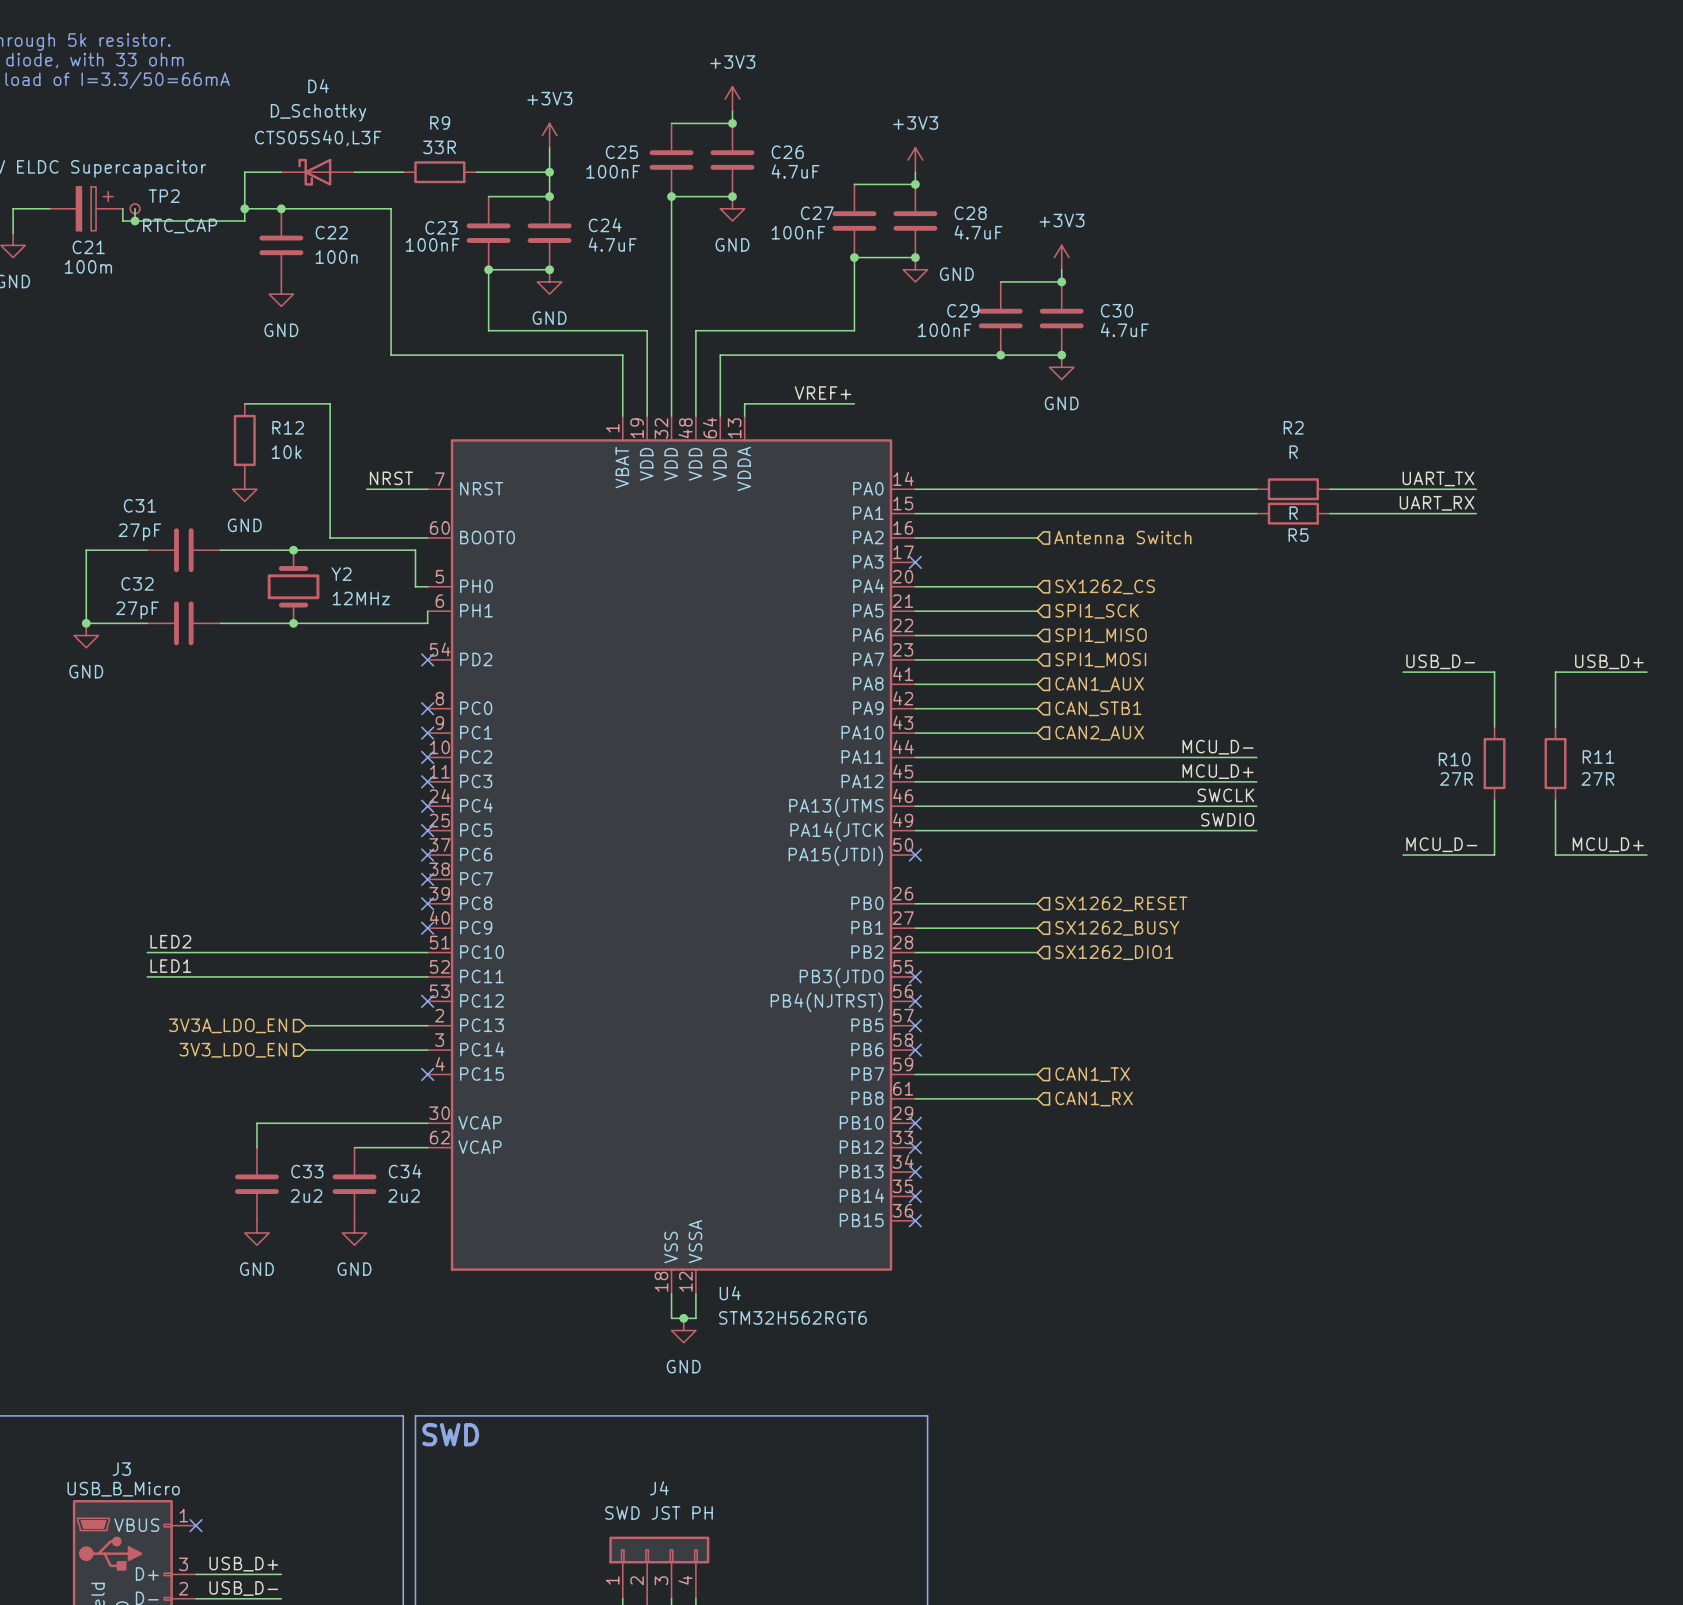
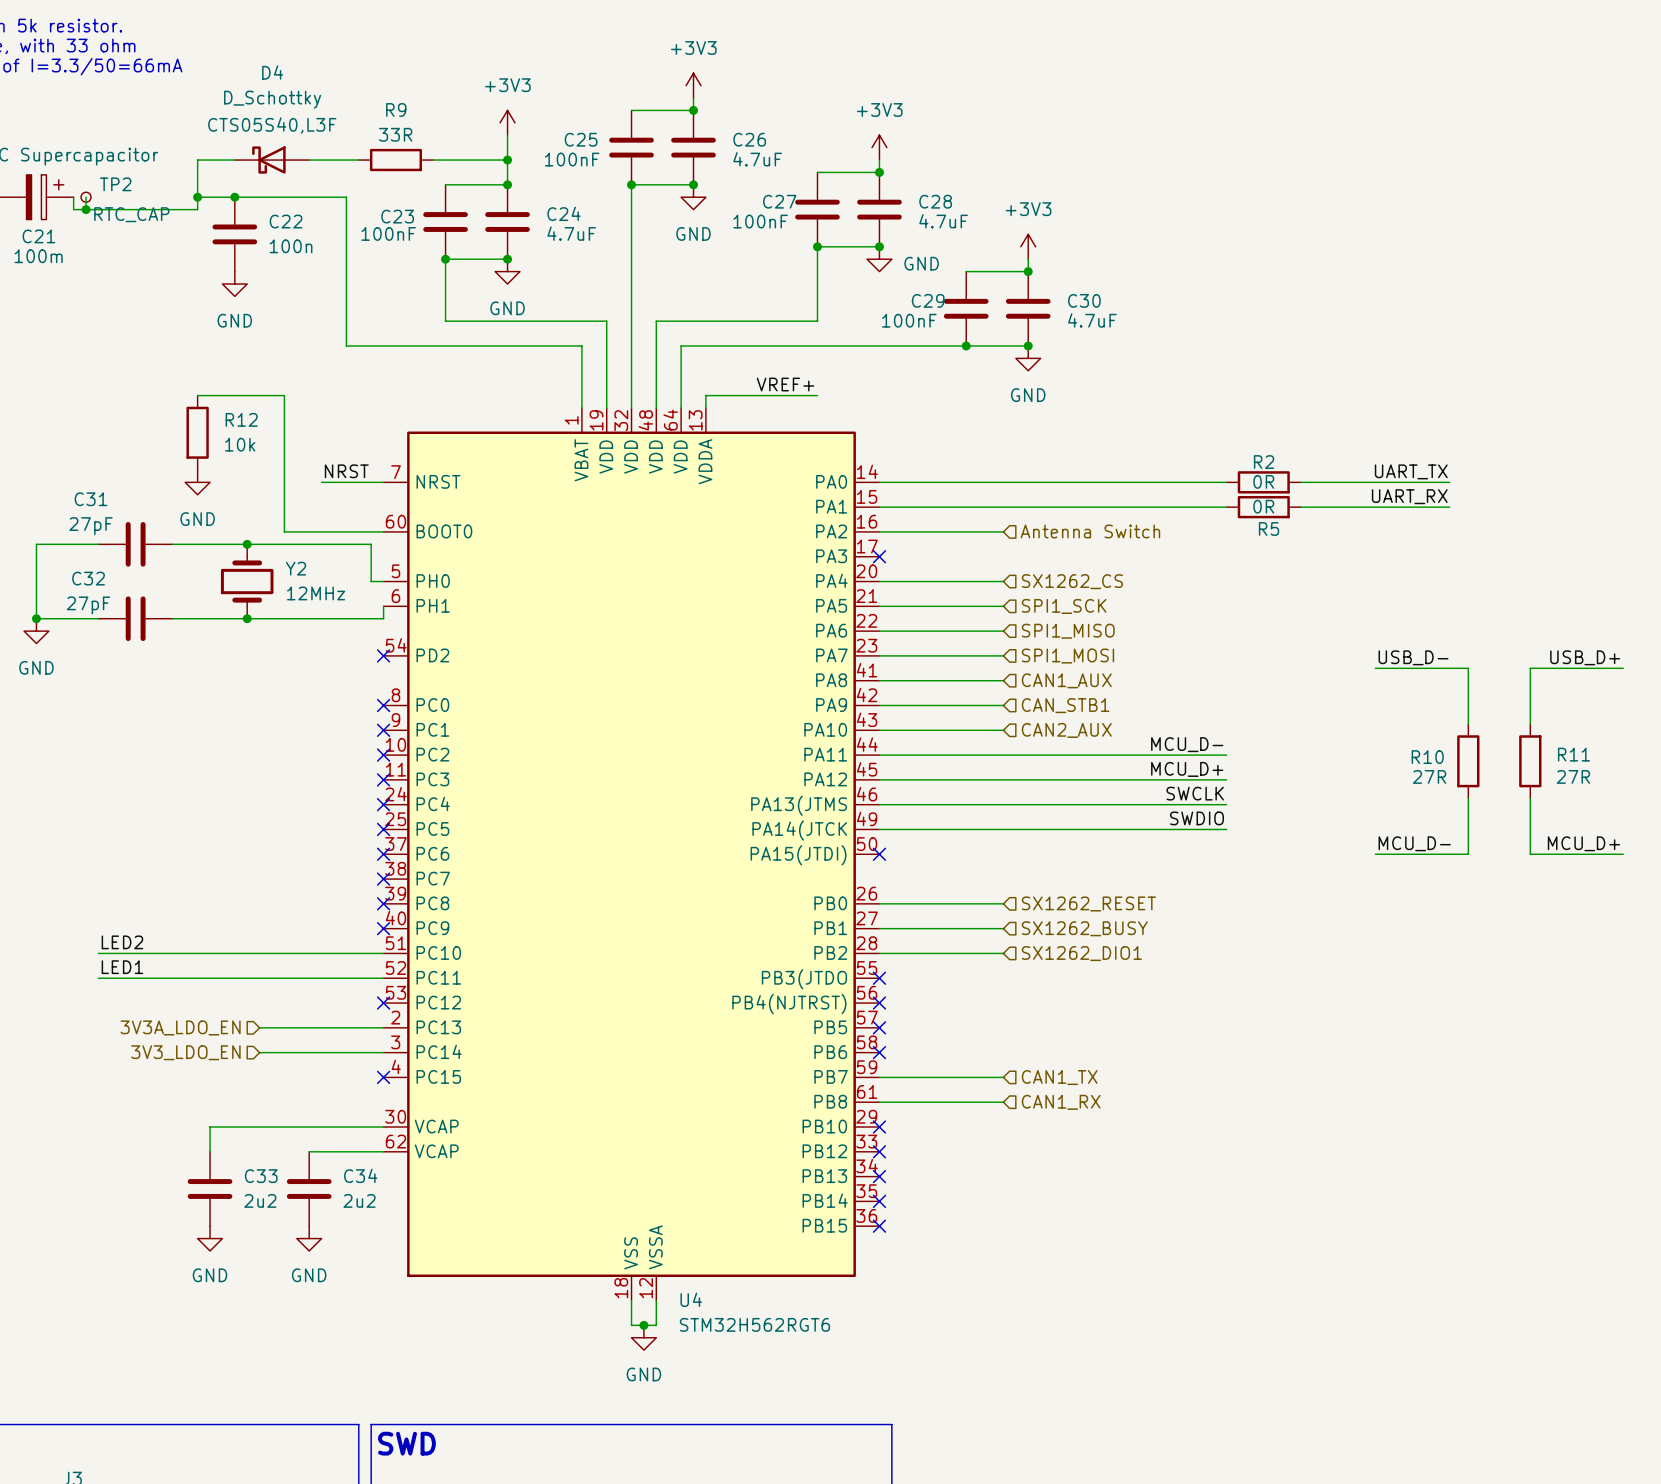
R2 name position: R2 (1293, 427) -> R2 (1264, 462)
R2 value: R (1293, 452) -> 0R (1263, 481)
R5 value: R (1293, 513) -> 0R (1263, 506)

